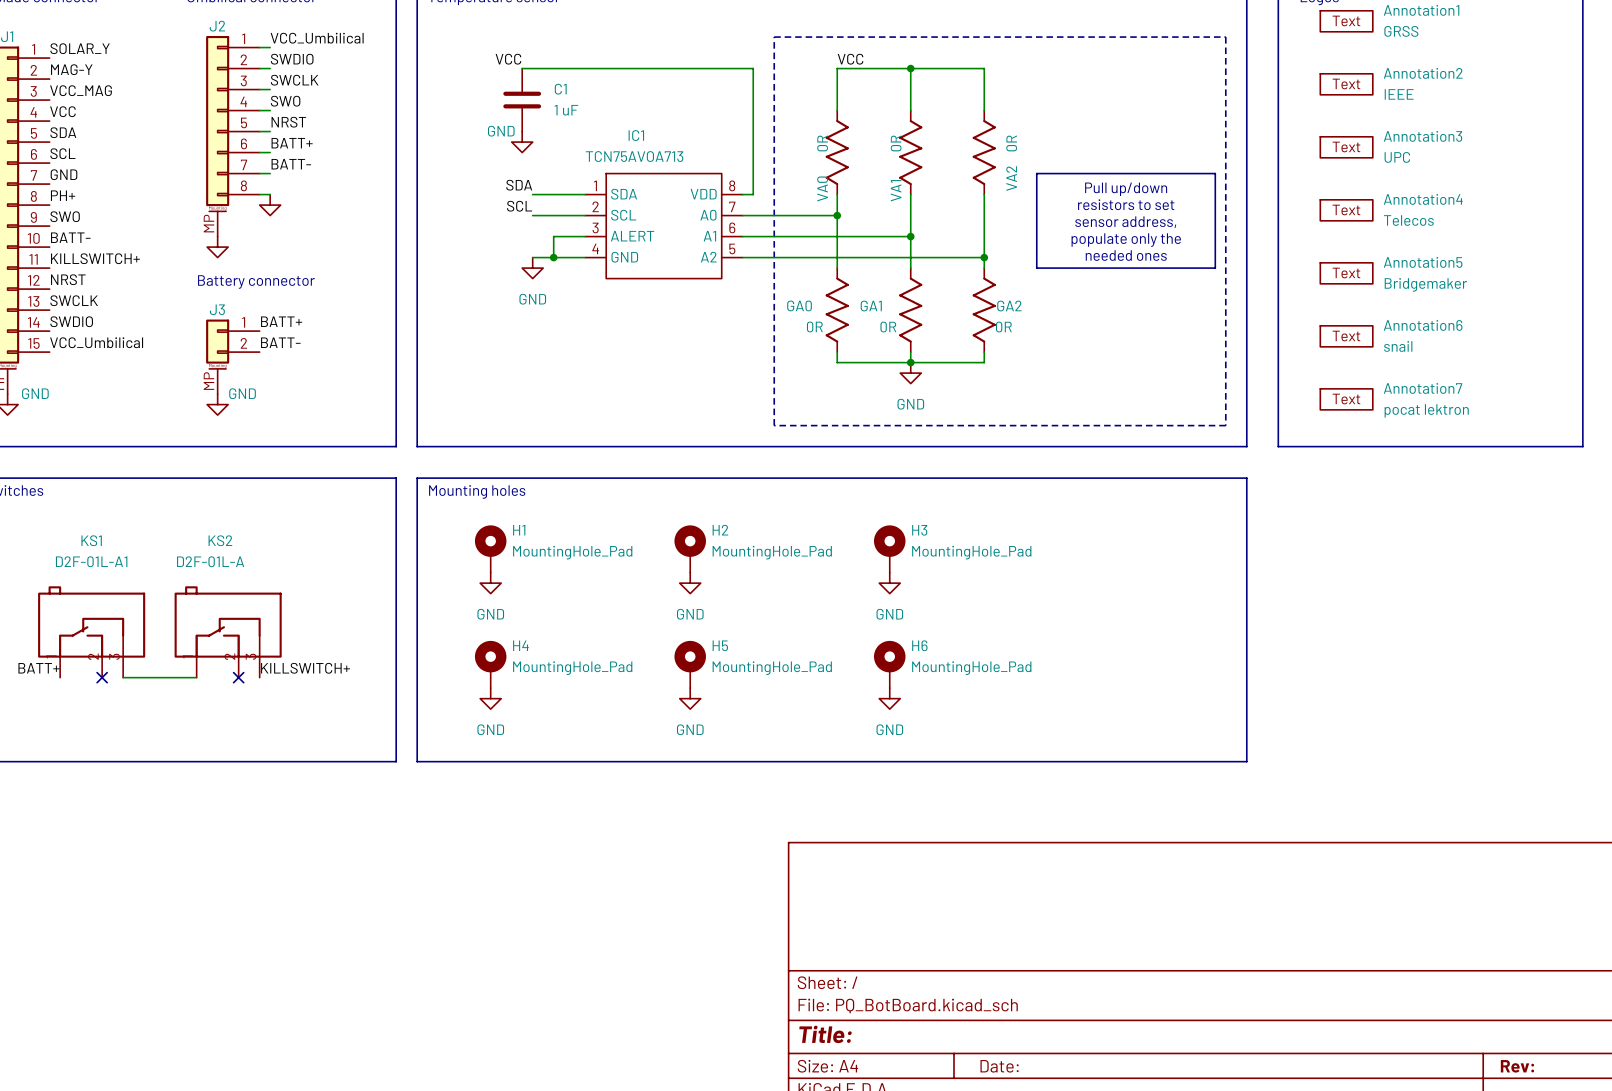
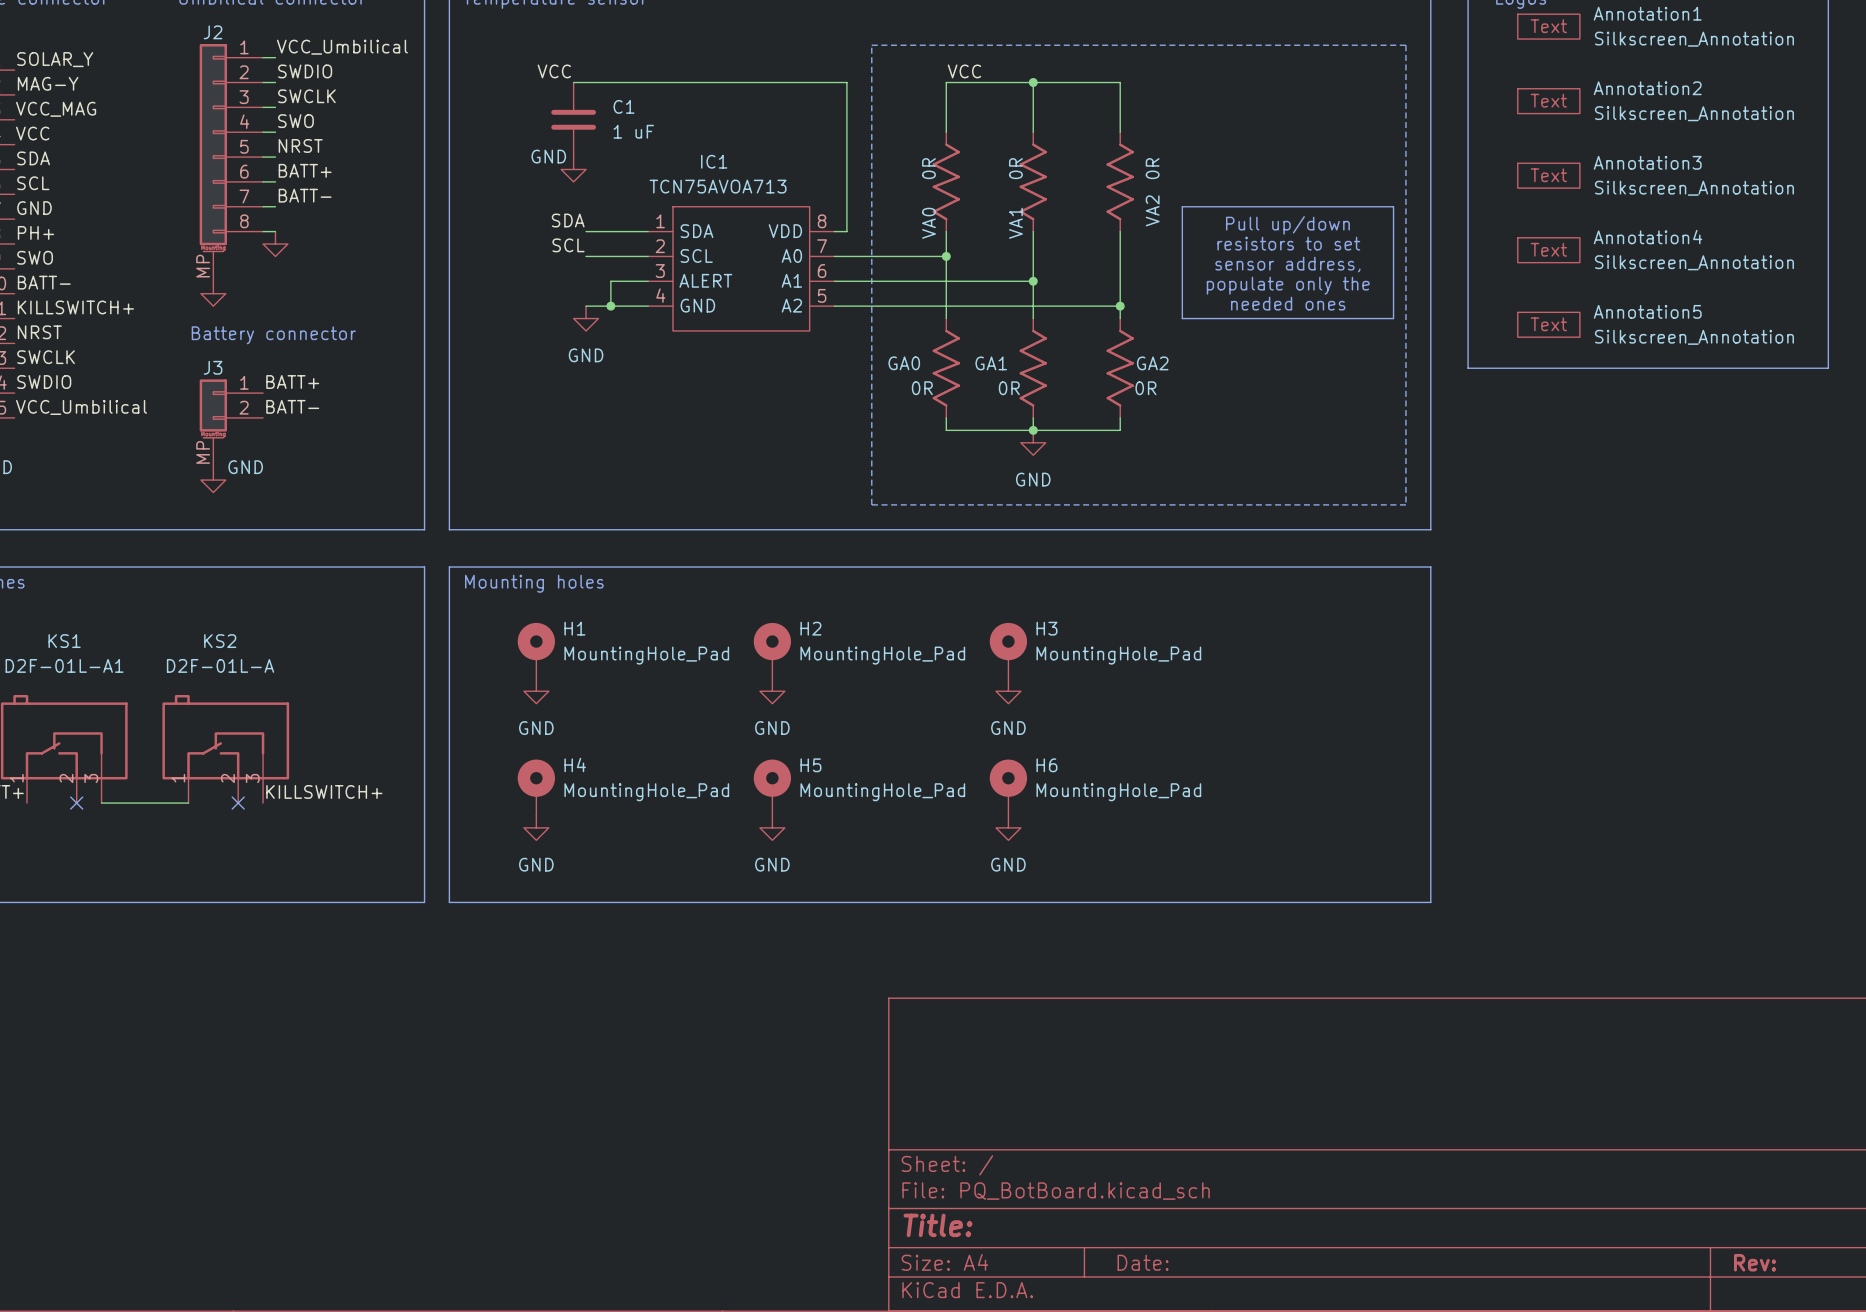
Annotation1 value: GRSS (1401, 31) -> Silkscreen_Annotation (1694, 39)
Annotation2 value: IEEE (1399, 94) -> Silkscreen_Annotation (1694, 113)
Annotation3 value: UPC (1397, 157) -> Silkscreen_Annotation (1694, 188)
Annotation4 value: Telecos (1408, 220) -> Silkscreen_Annotation (1694, 262)
Annotation5 value: Bridgemaker (1425, 284) -> Silkscreen_Annotation (1694, 337)
line: (1278, 310) (1278, 446) (1582, 446) (1582, 310) -> (1468, 368) (1828, 368)
Annotation6: snail (1346, 336) -> none
Annotation7: pocat lektron (1346, 399) -> none

